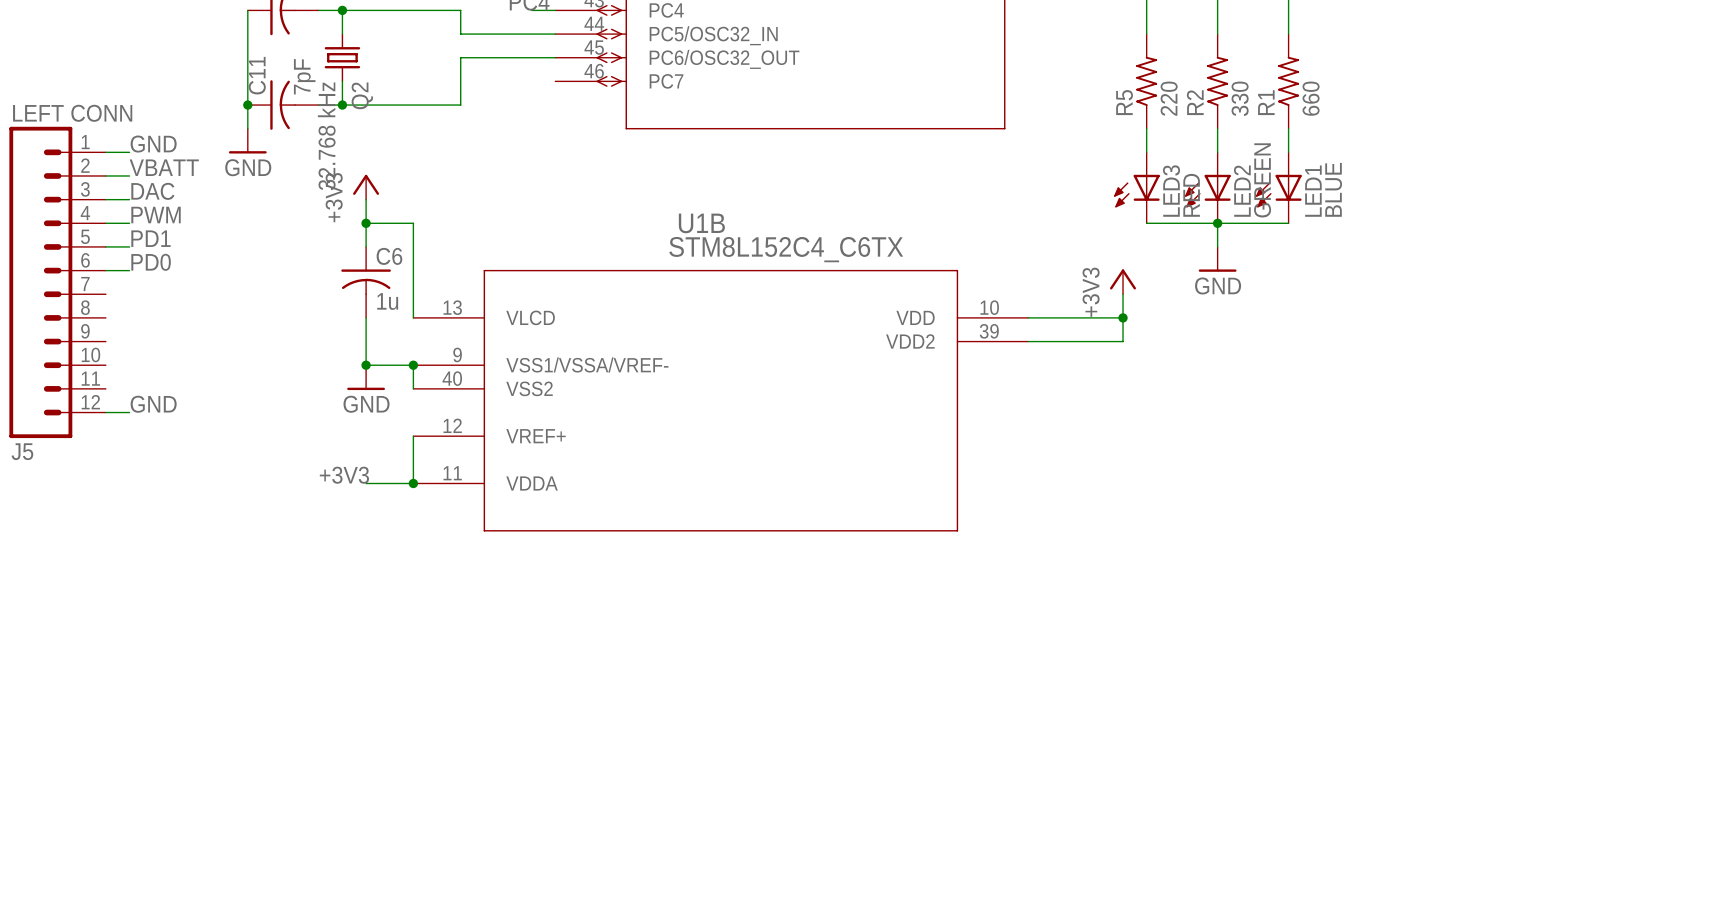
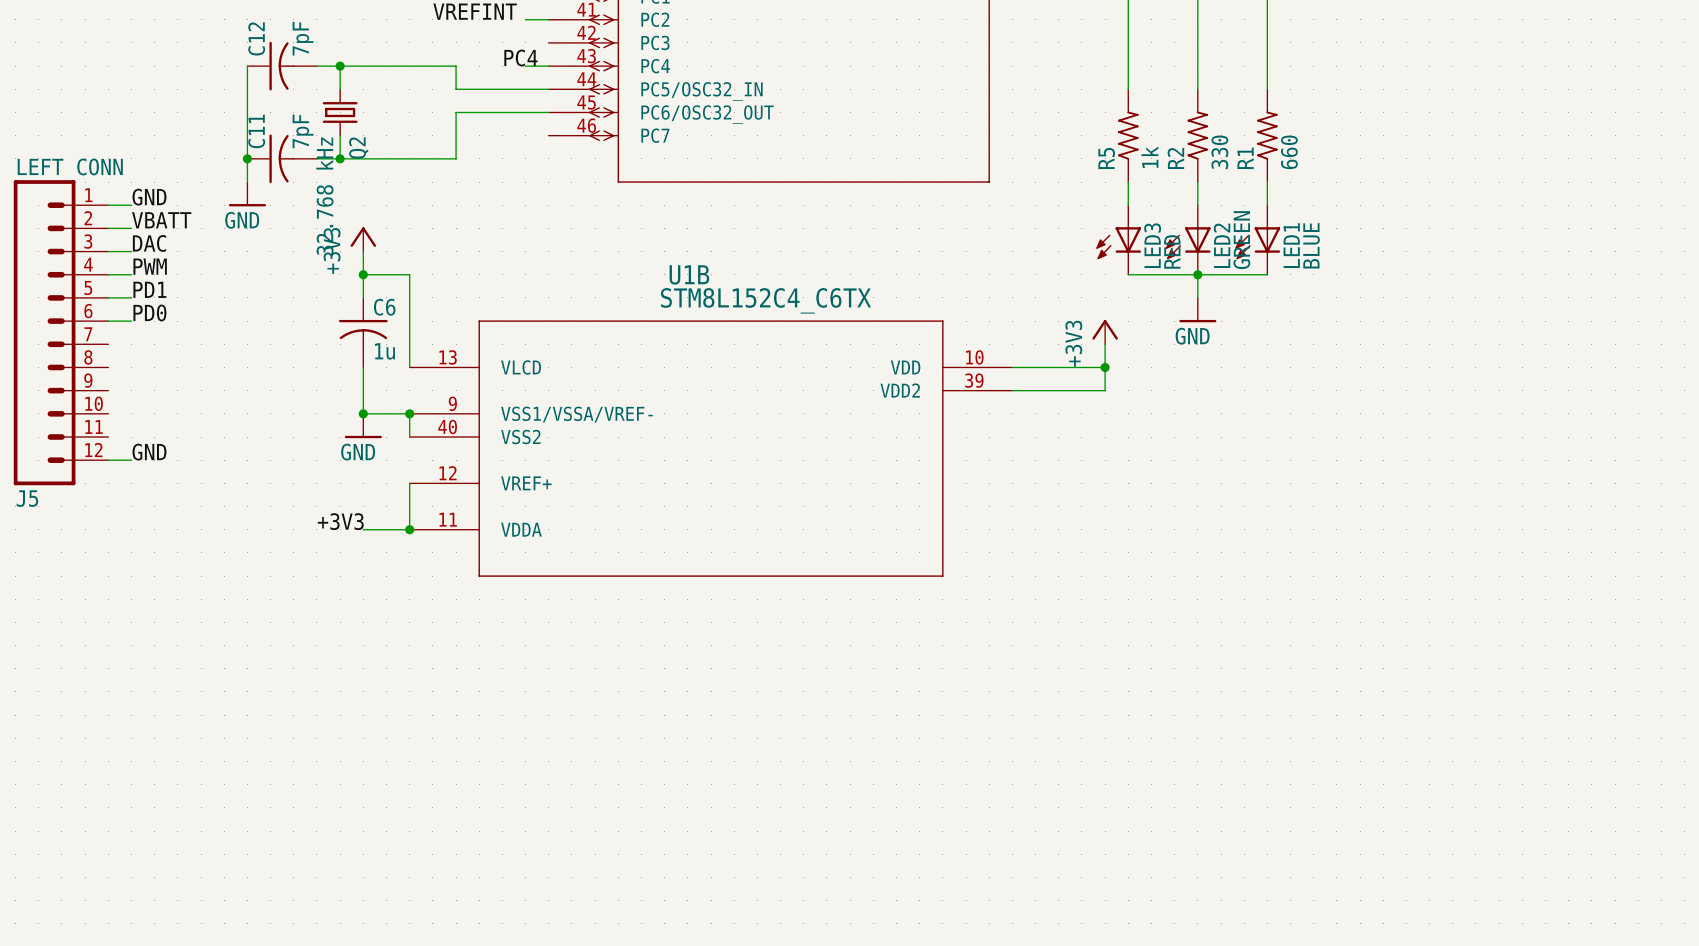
R5 value: 220 (1169, 98) -> 1k (1149, 157)

